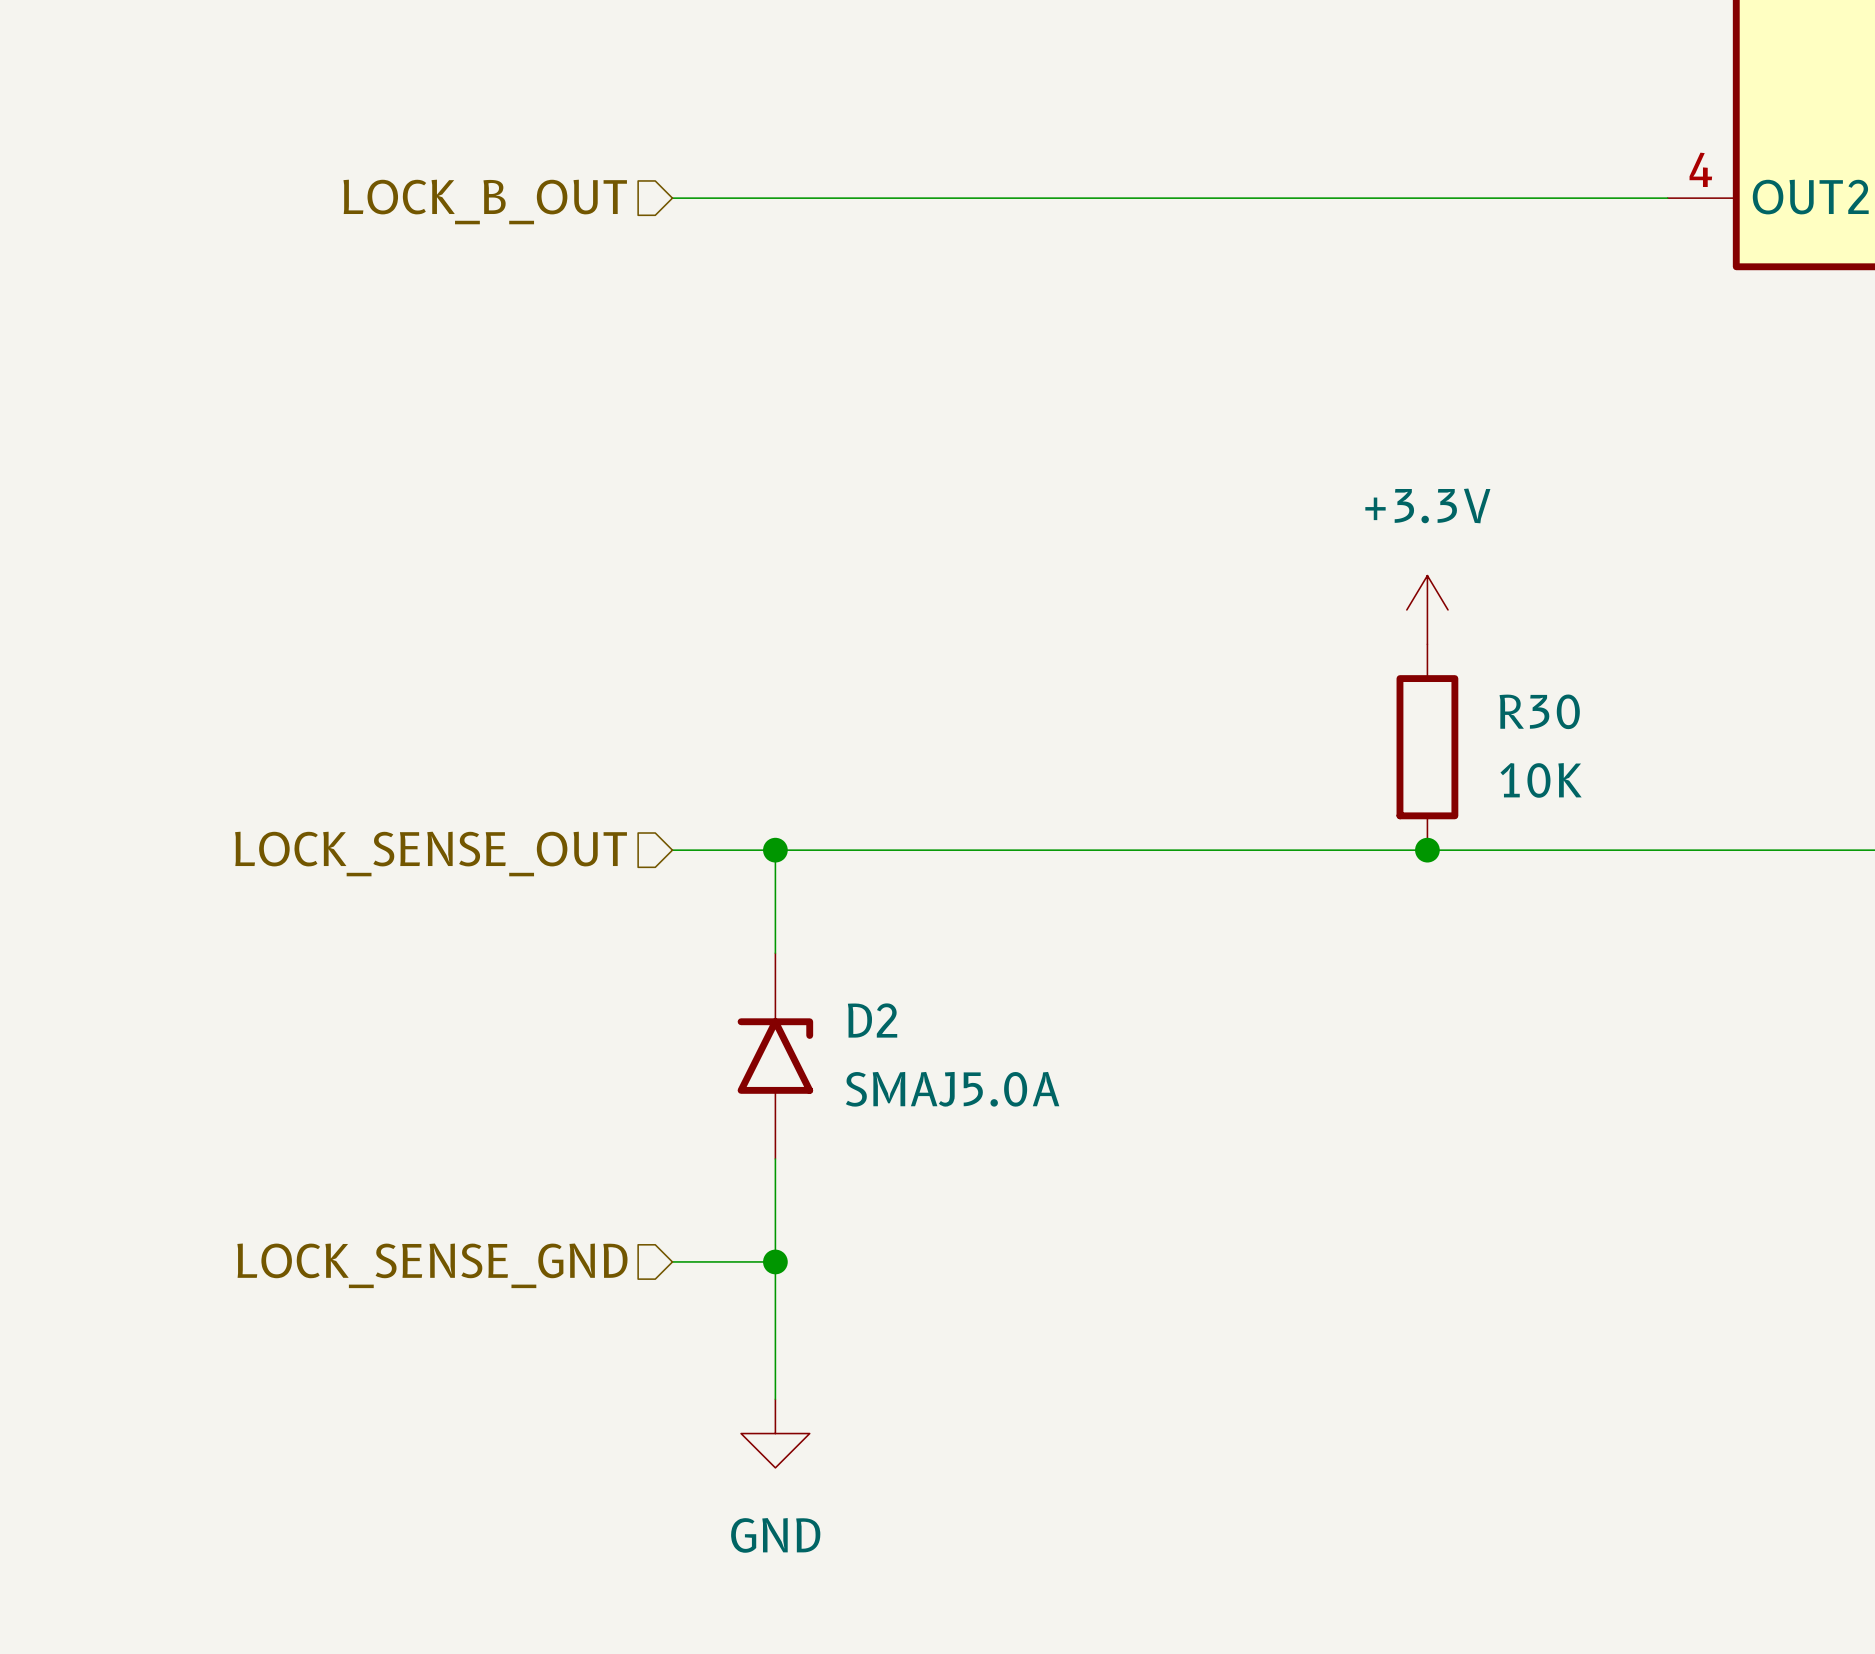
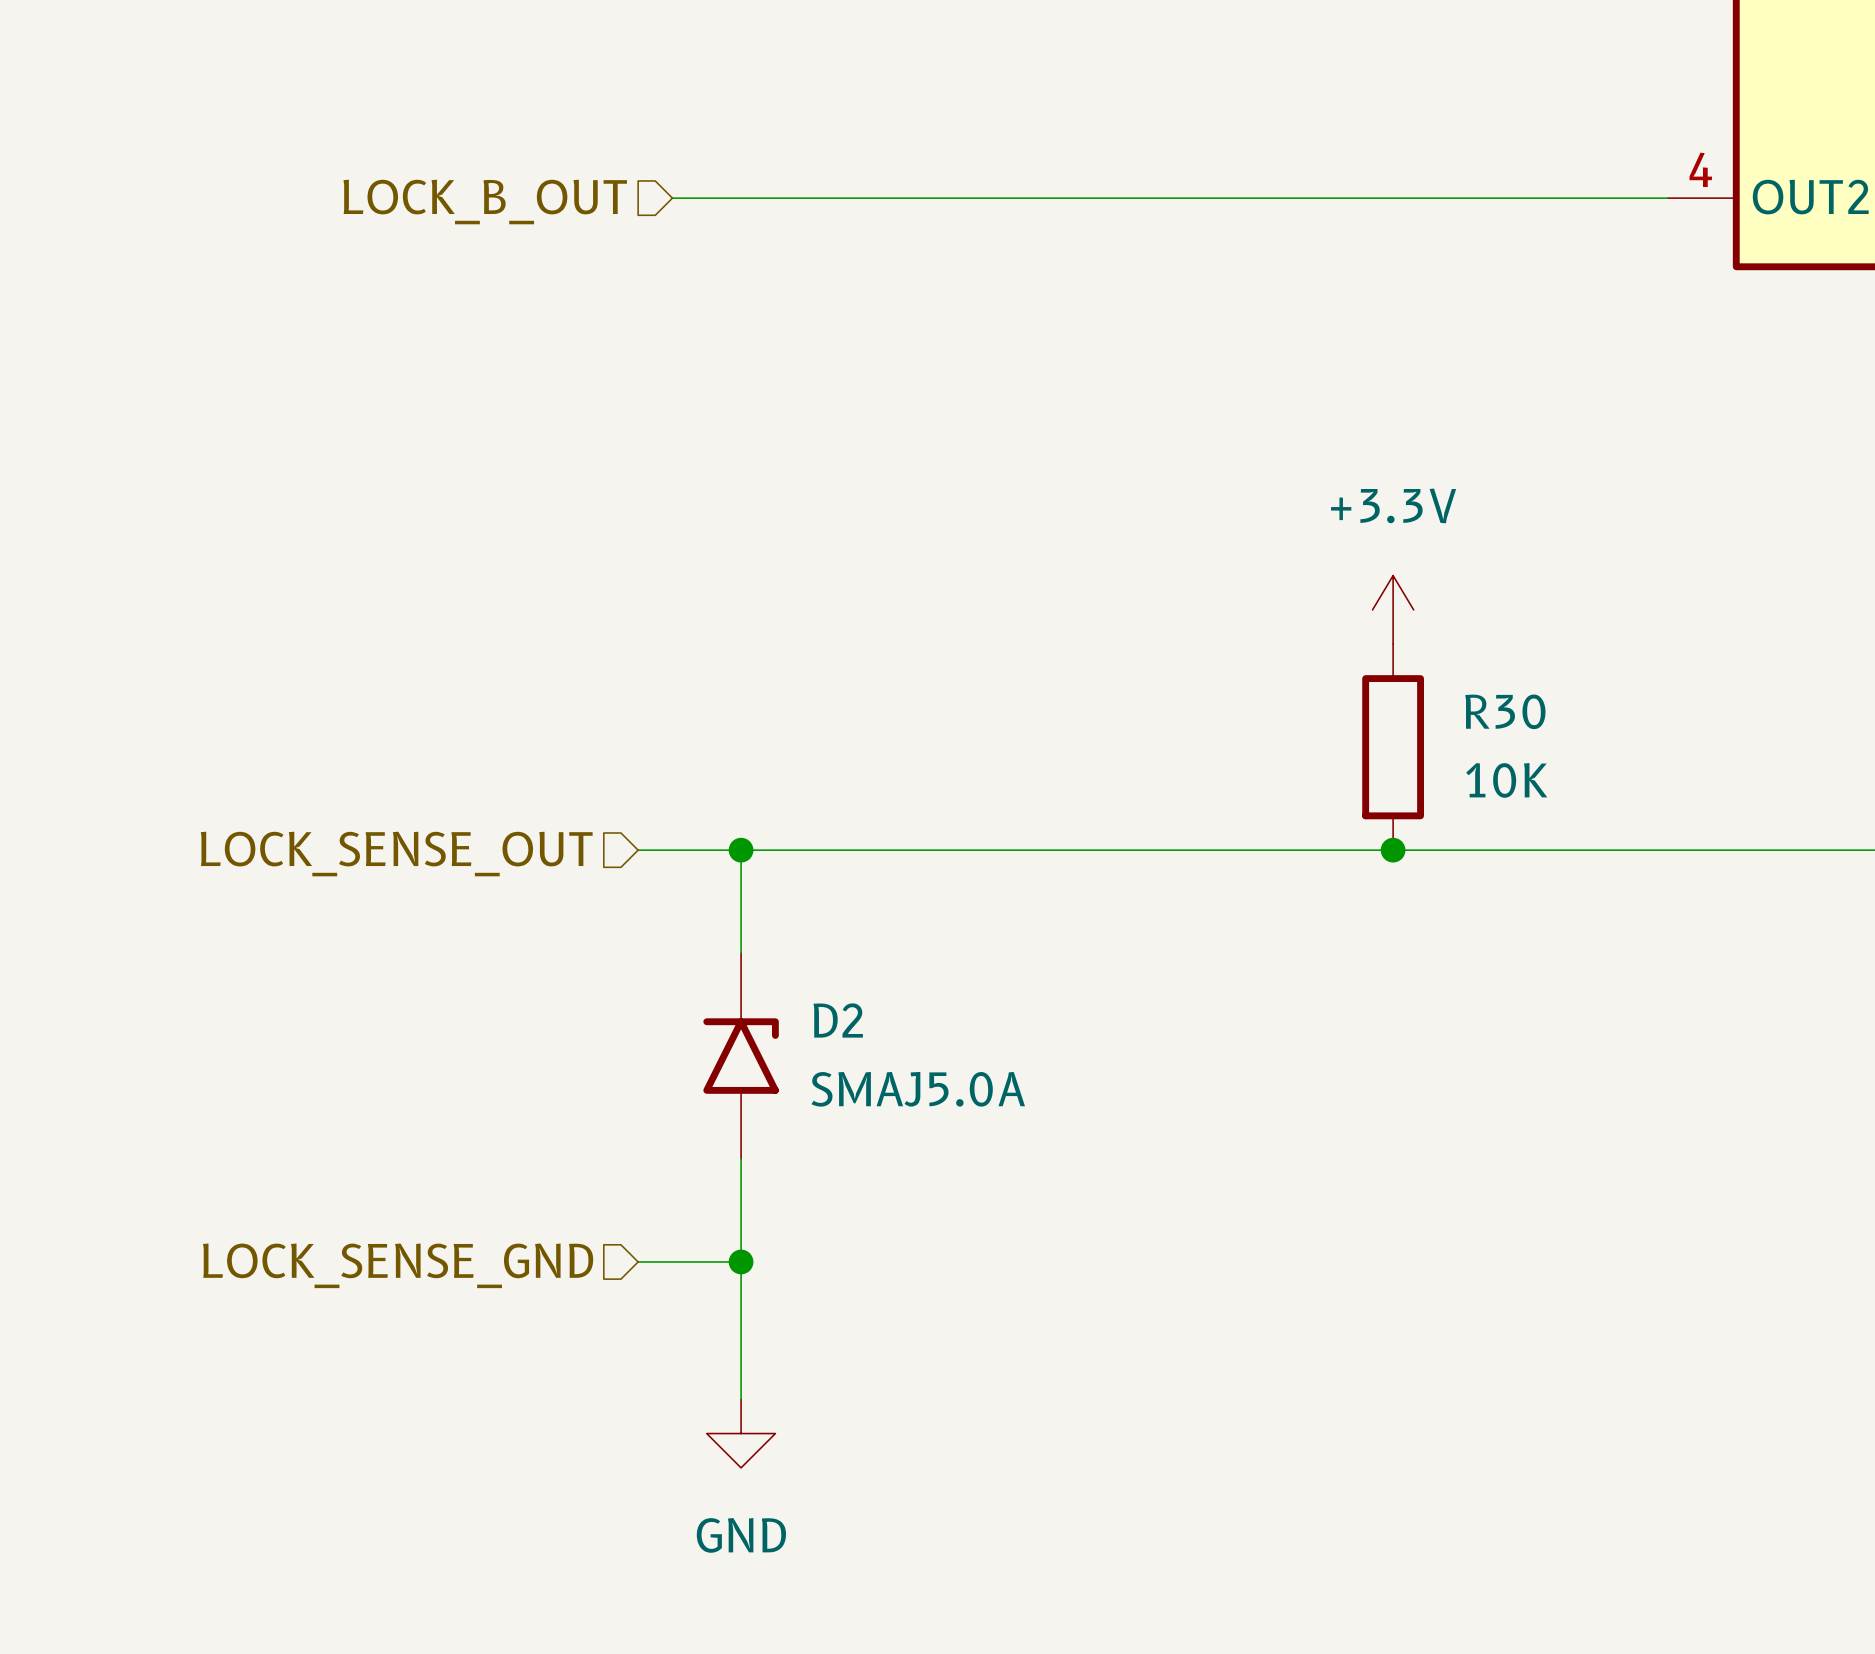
power symbol position: +3.3V (1427, 609) -> +3.3V (1393, 609)
R30 position: (1427, 747) -> (1393, 747)
wire: none -> (638, 850) (672, 850)
wire: (775, 850) (775, 953) -> (741, 850) (741, 953)
junction position: (775, 850) -> (741, 850)
junction position: (1427, 850) -> (1393, 850)
hierarchical label position: LOCK_SENSE_OUT (431, 854) -> LOCK_SENSE_OUT (396, 854)
D2 position: (775, 1056) -> (741, 1056)
wire: (775, 1159) (775, 1399) -> (741, 1159) (741, 1399)
wire: (741, 1261) (775, 1261) -> (638, 1261) (672, 1261)
junction position: (775, 1261) -> (741, 1261)
hierarchical label position: LOCK_SENSE_GND (432, 1265) -> LOCK_SENSE_GND (398, 1265)
power symbol position: GND (775, 1433) -> GND (741, 1433)

